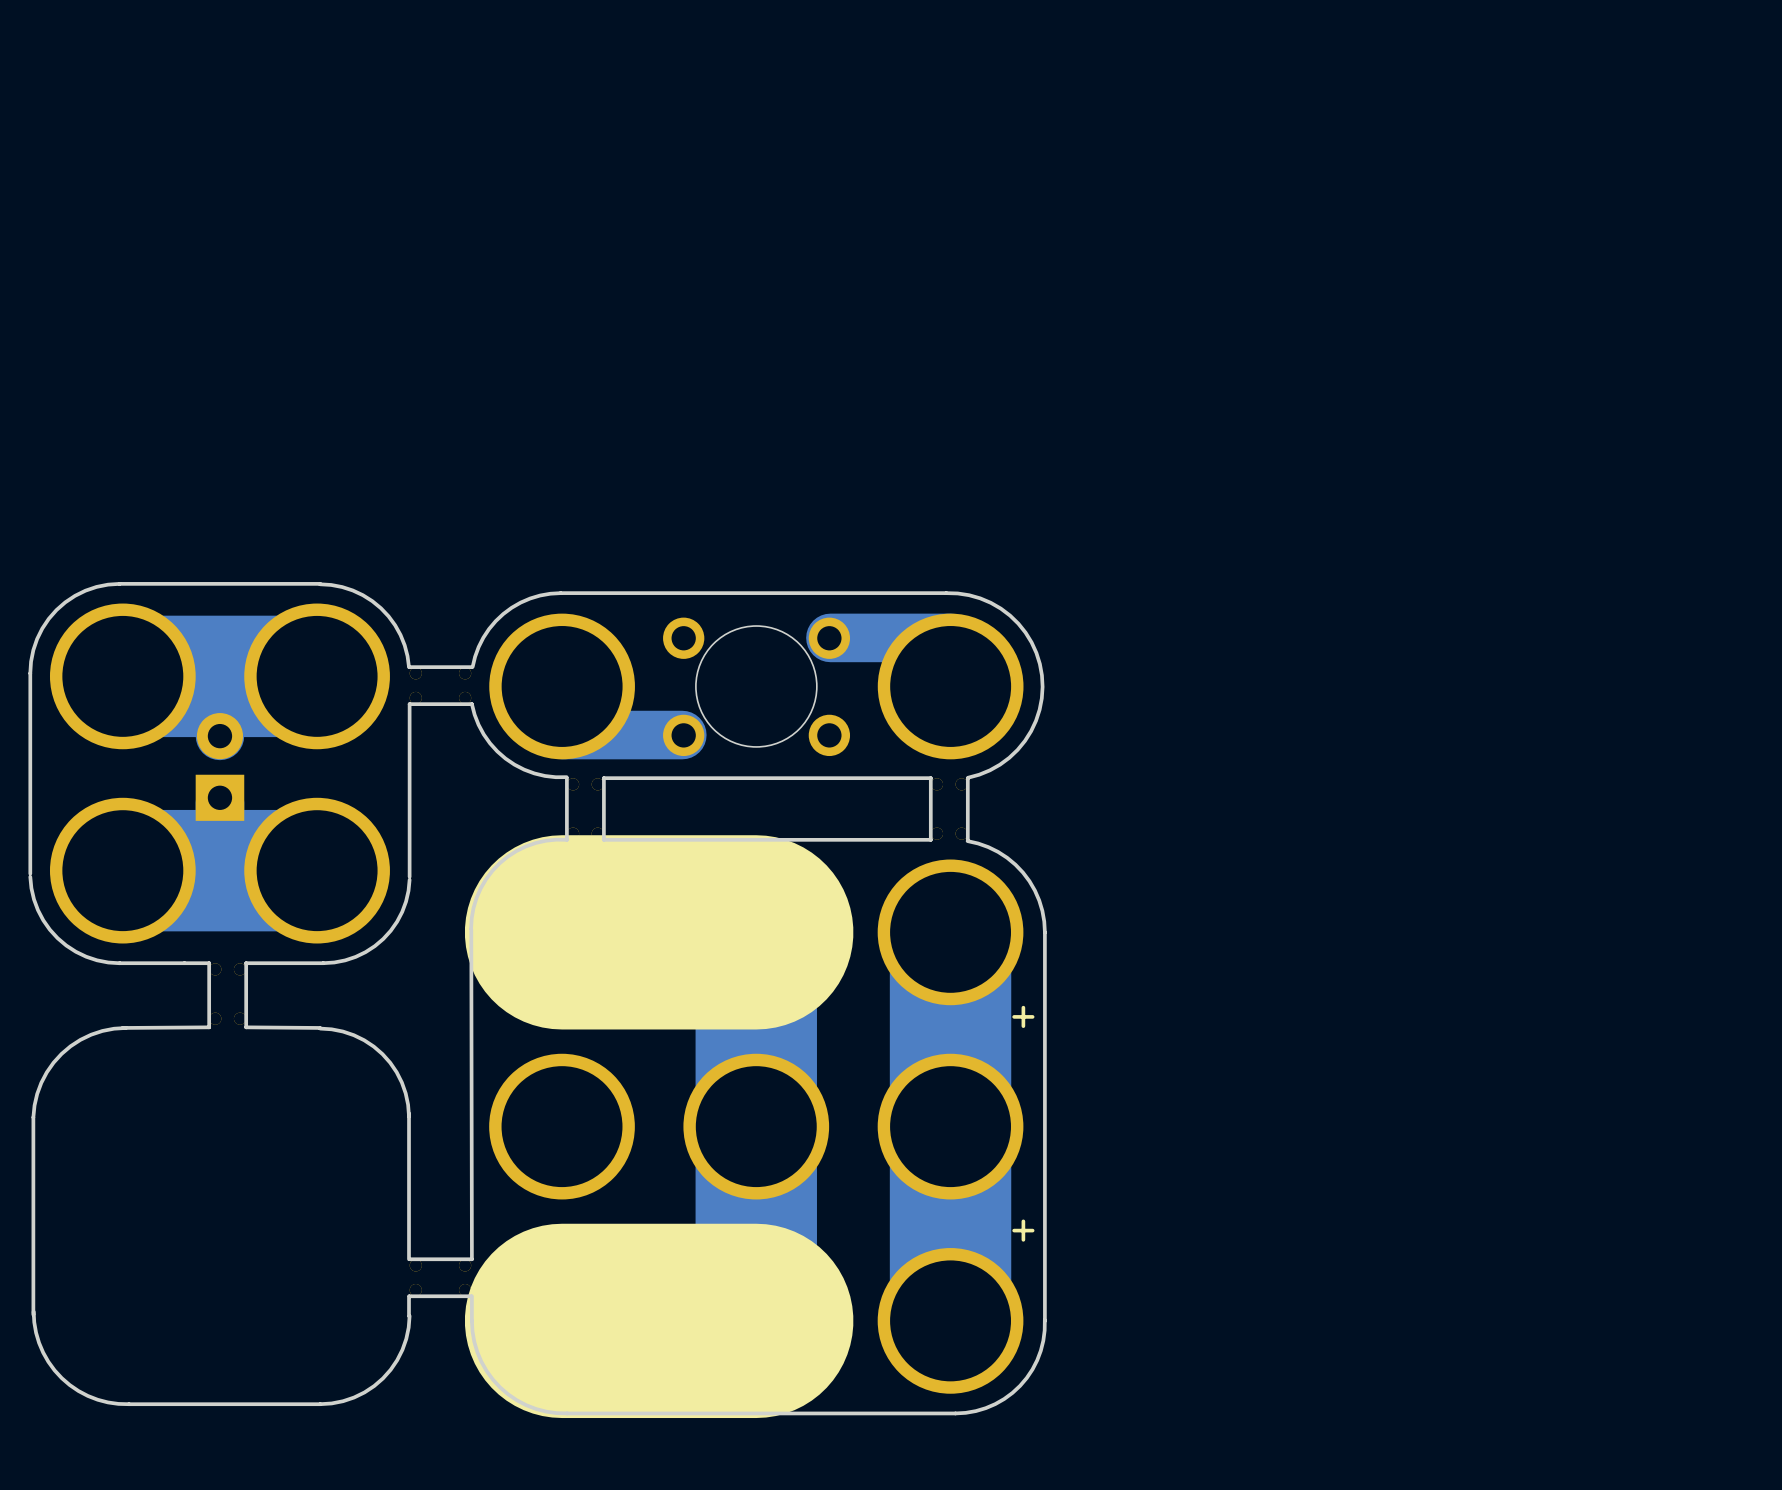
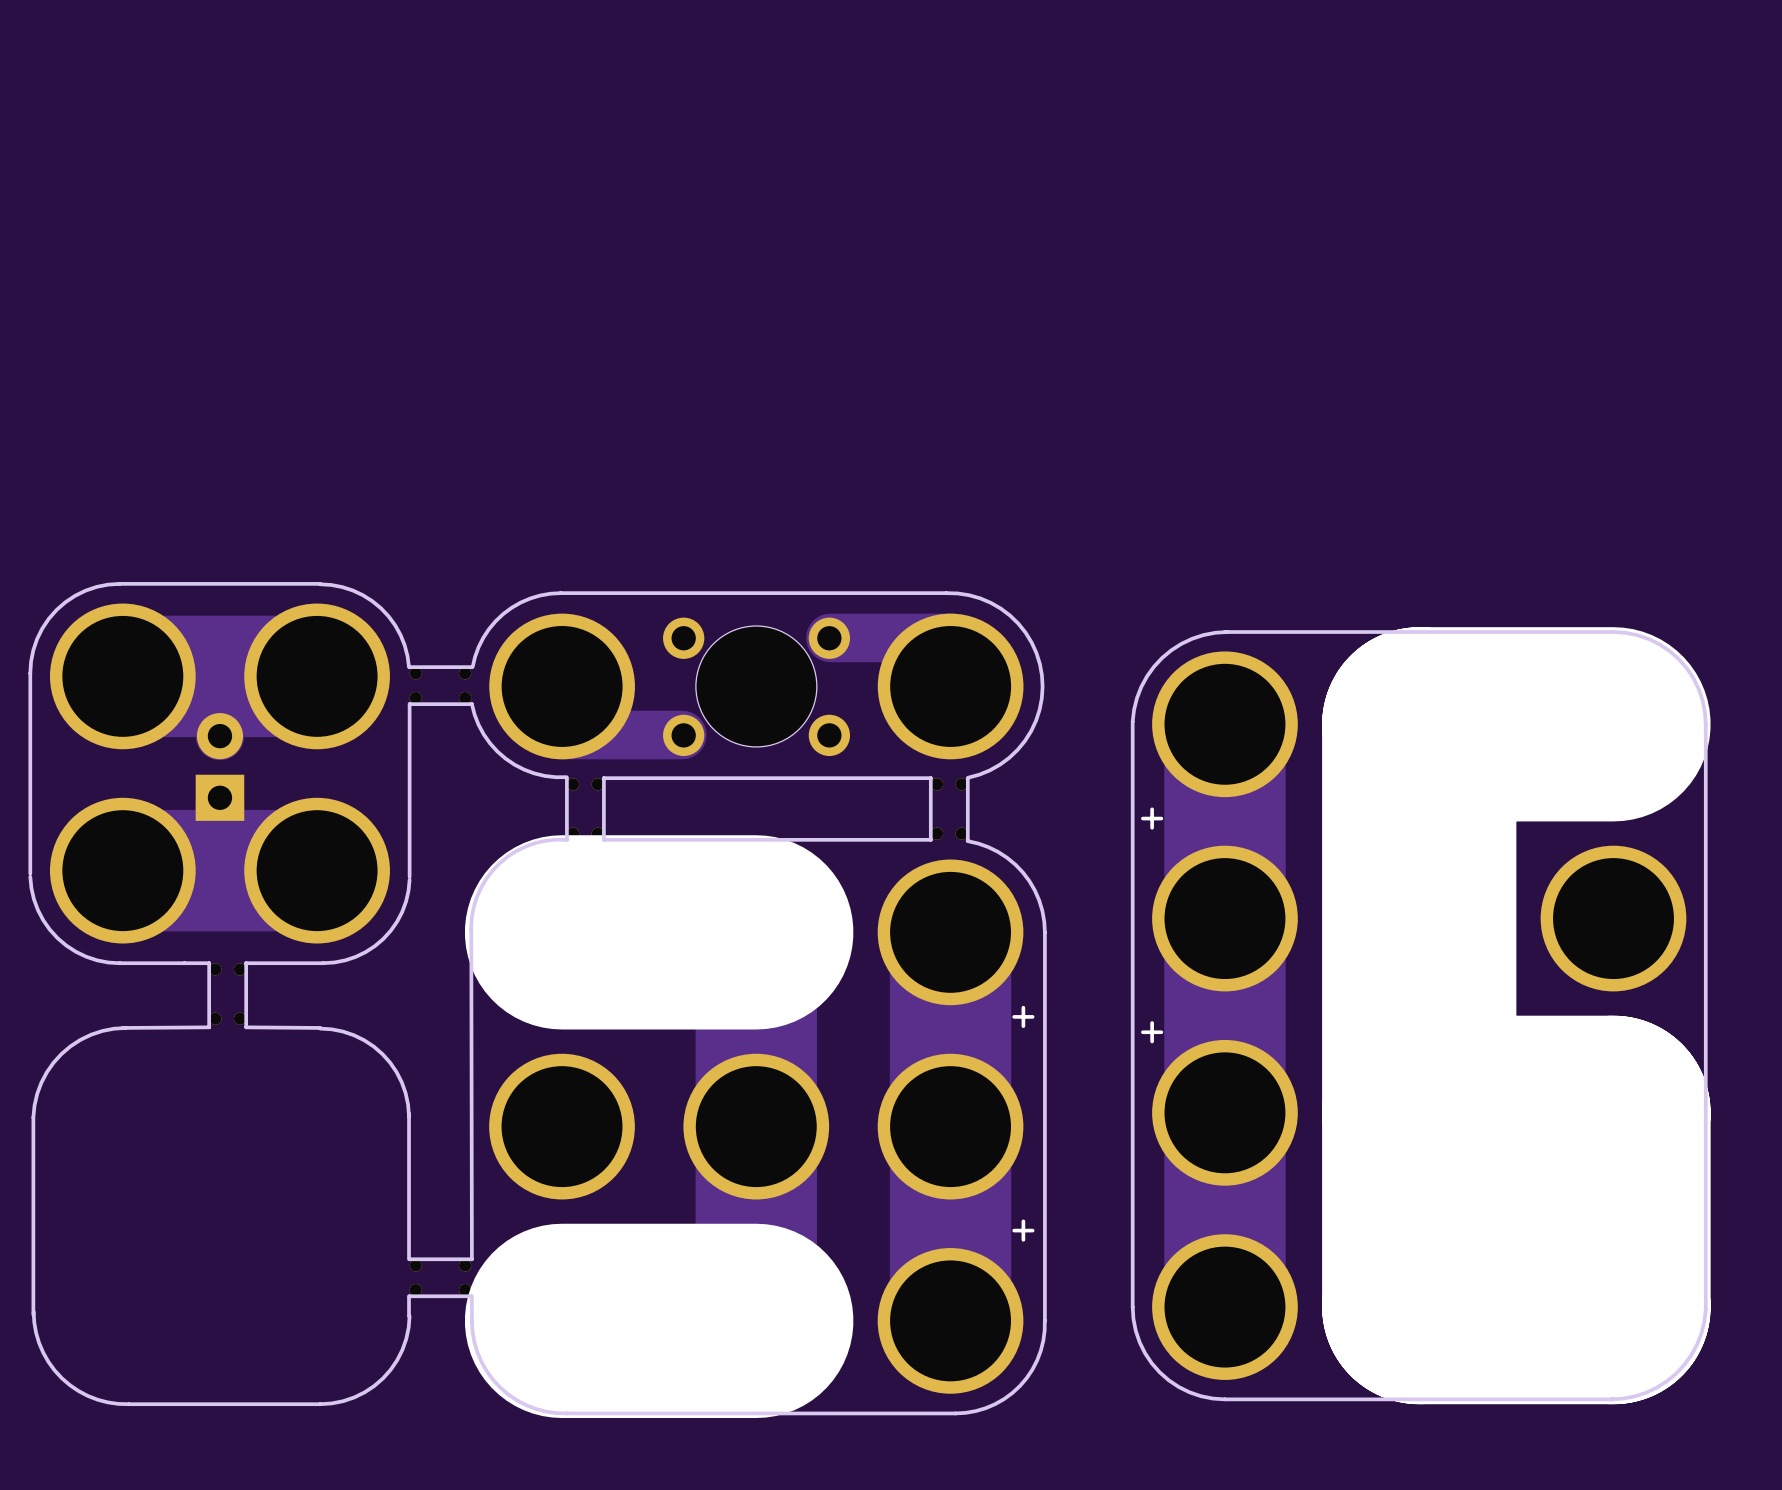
board edge: none -> (1224, 632) (1625, 632) (1637, 635) (1659, 644) (1678, 659) (1686, 668) (1698, 688) (1702, 700) (1705, 724) (1705, 1309)
board edge: none -> (1227, 632) (1215, 632) (1192, 638) (1181, 643) (1162, 657) (1147, 676) (1141, 686) (1134, 709) (1132, 721)
board edge: none -> (1132, 721) (1132, 1307) (1133, 1319) (1139, 1342) (1151, 1363) (1168, 1380) (1178, 1387) (1201, 1396) (1212, 1398) (1613, 1399)
part: none -> (1431, 1015)
board edge: none -> (1705, 1309) (1701, 1333) (1697, 1344) (1684, 1364) (1676, 1373) (1667, 1381) (1646, 1392) (1623, 1398) (1611, 1399)

